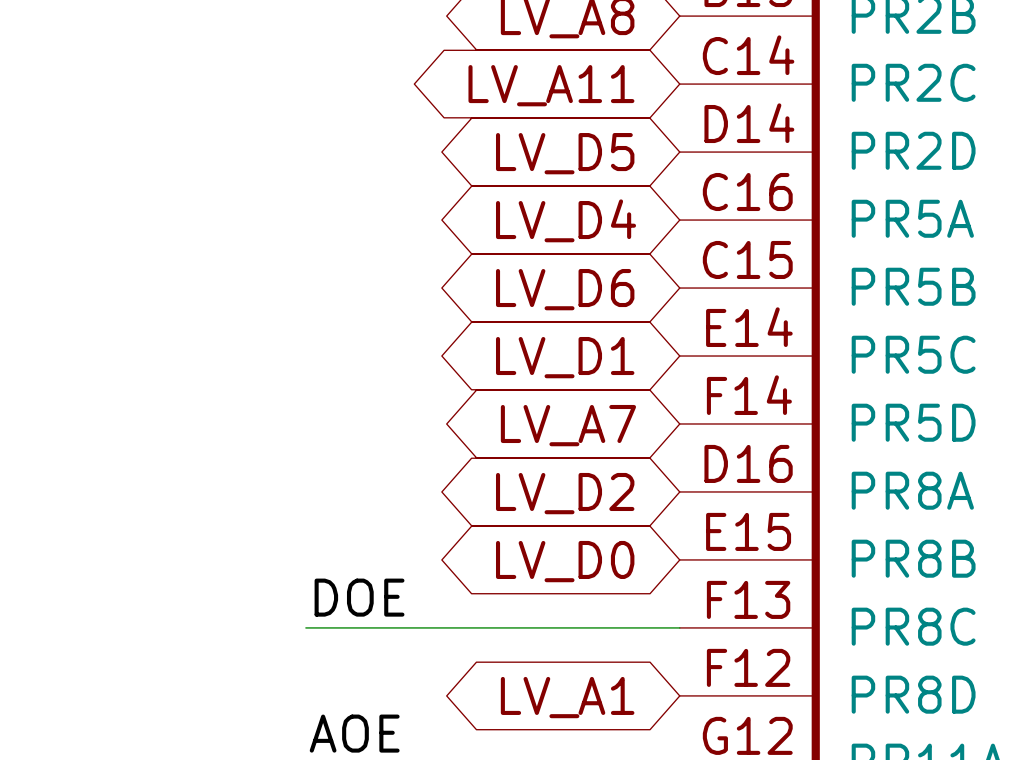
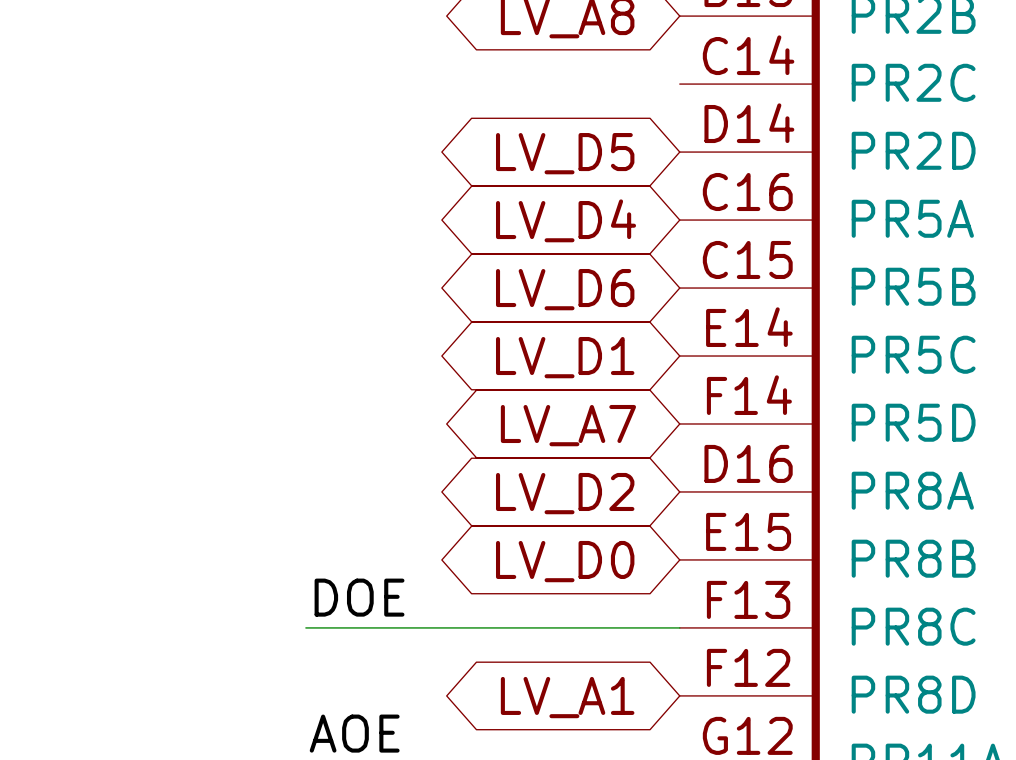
global label: LV_A11 (551, 85) -> none

